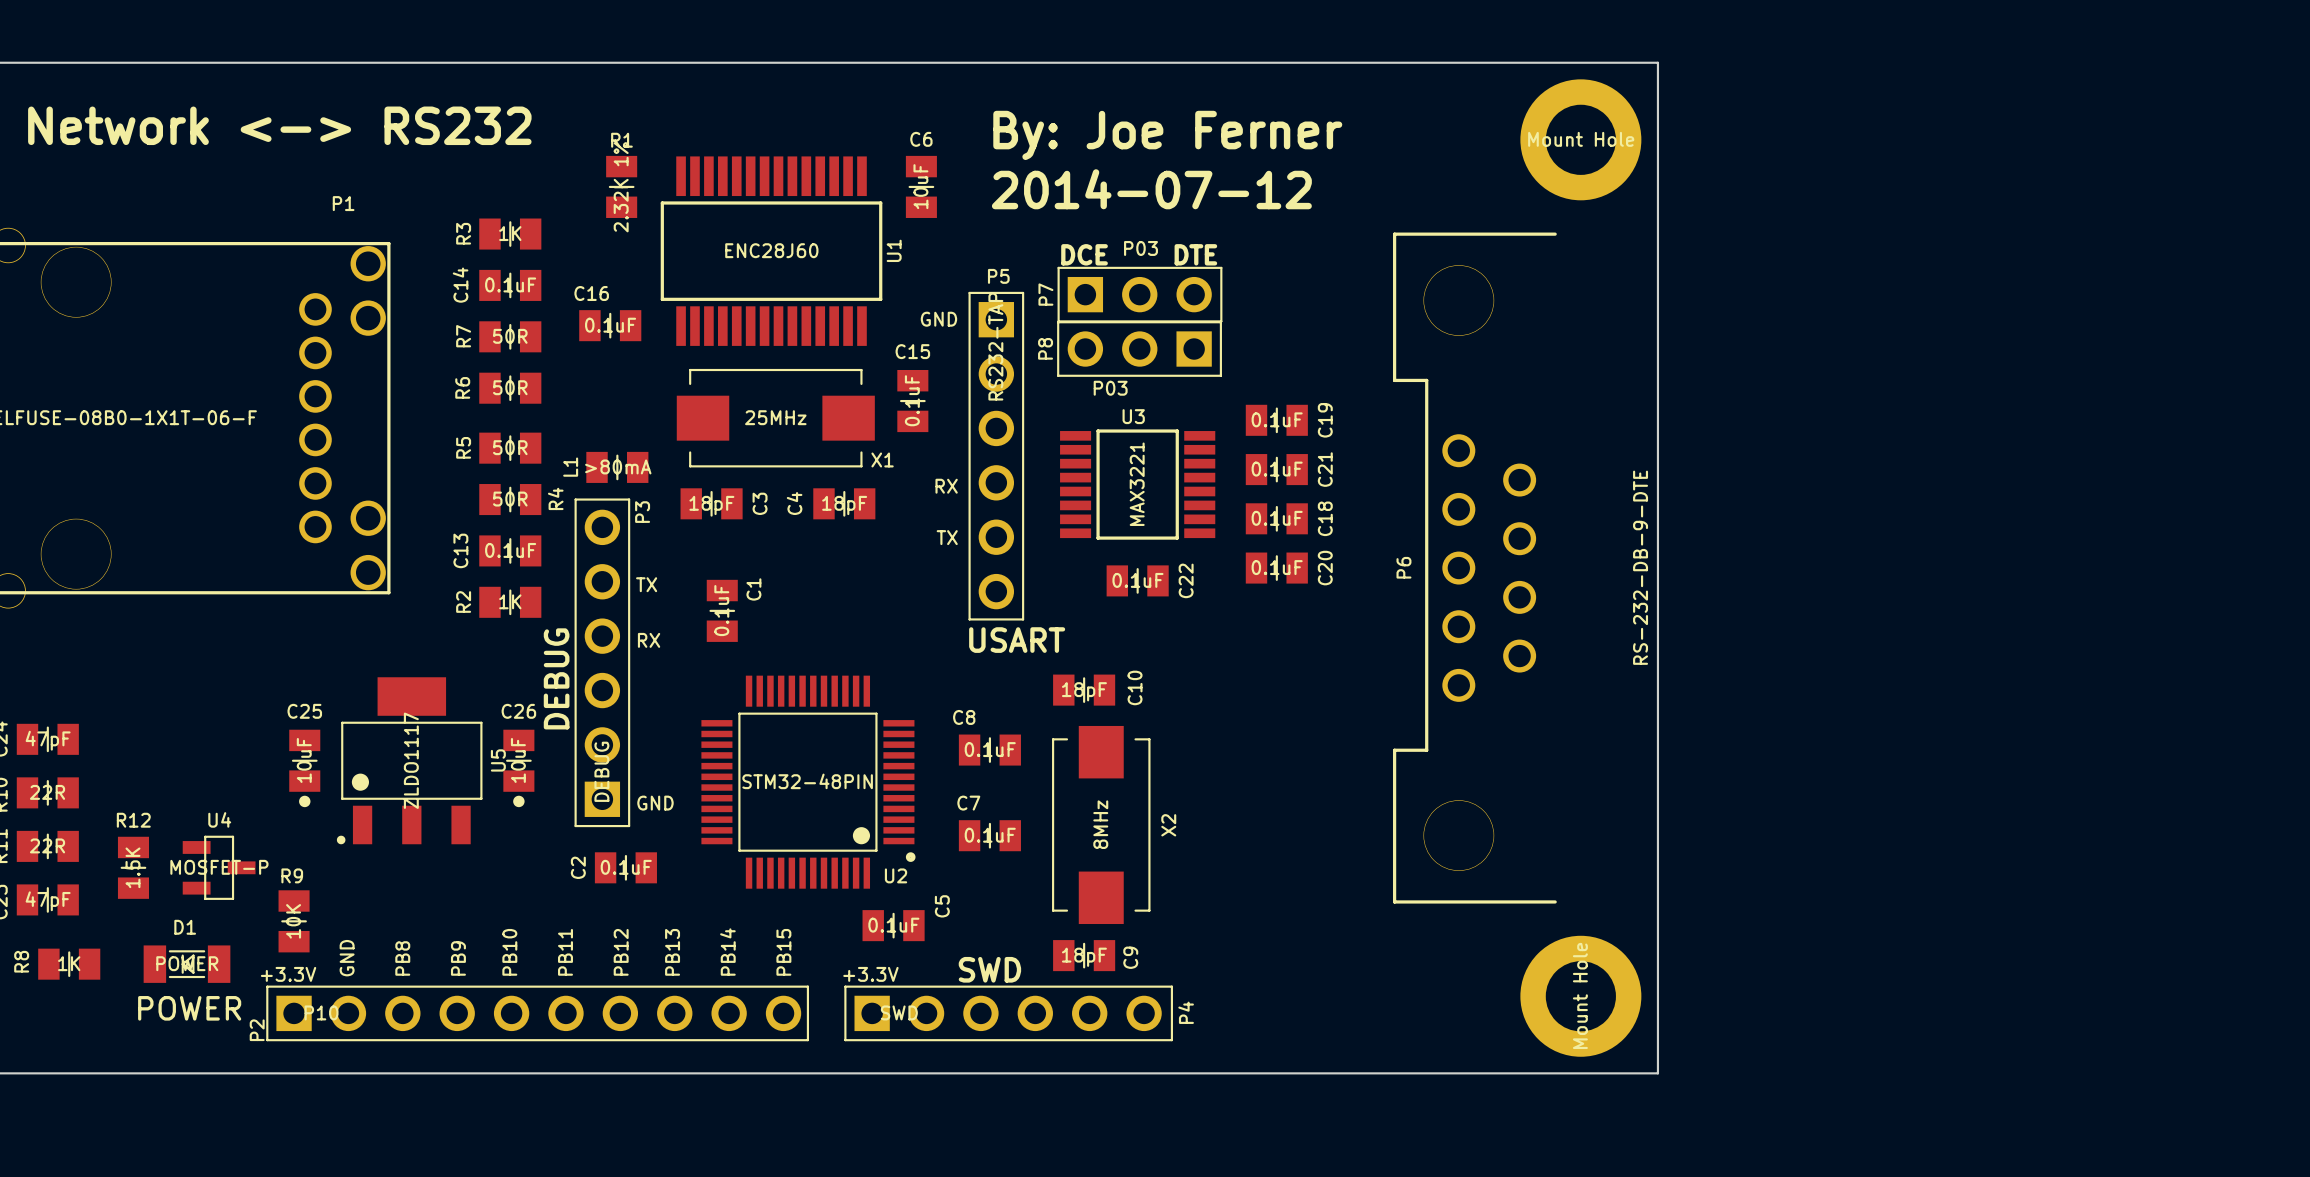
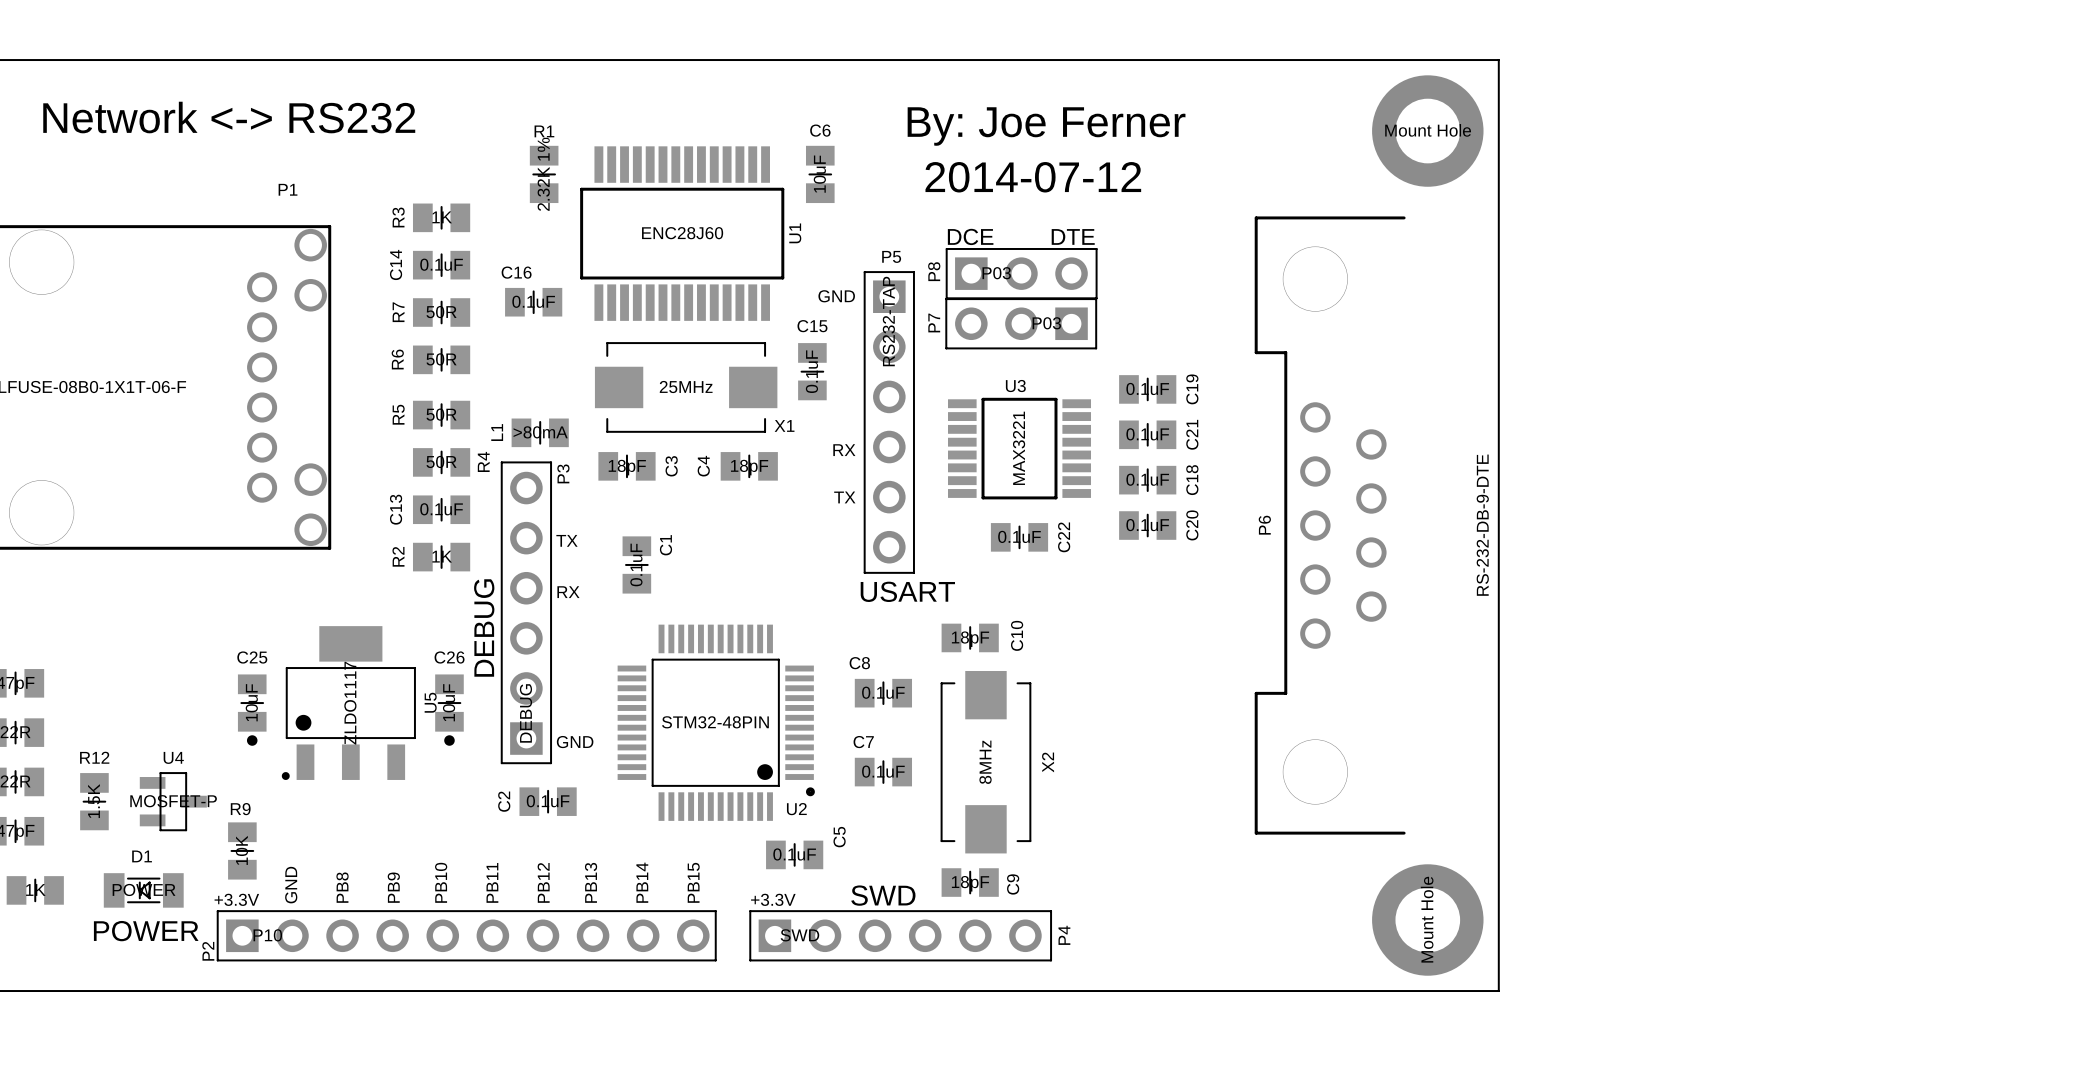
P7 value position: P03 (1140, 248) -> P03 (996, 273)
P7 name position: P7 (1045, 294) -> P7 (934, 323)
P8 name position: P8 (1045, 348) -> P8 (934, 271)
P8 value position: P03 (1110, 388) -> P03 (1046, 323)

